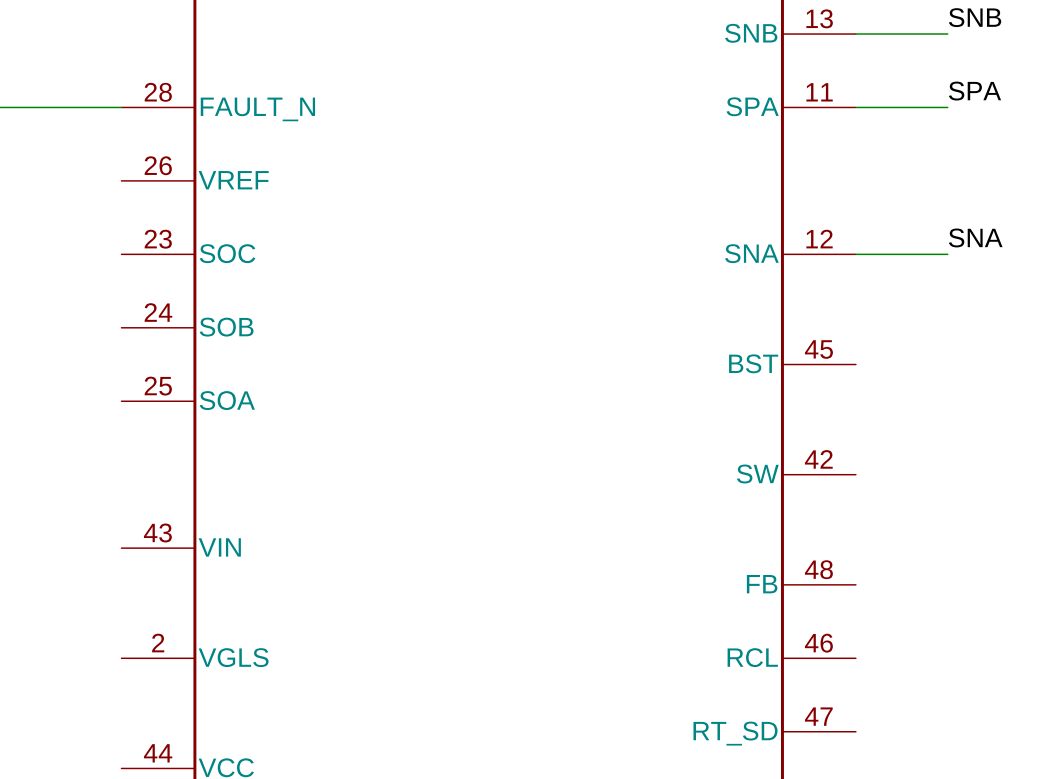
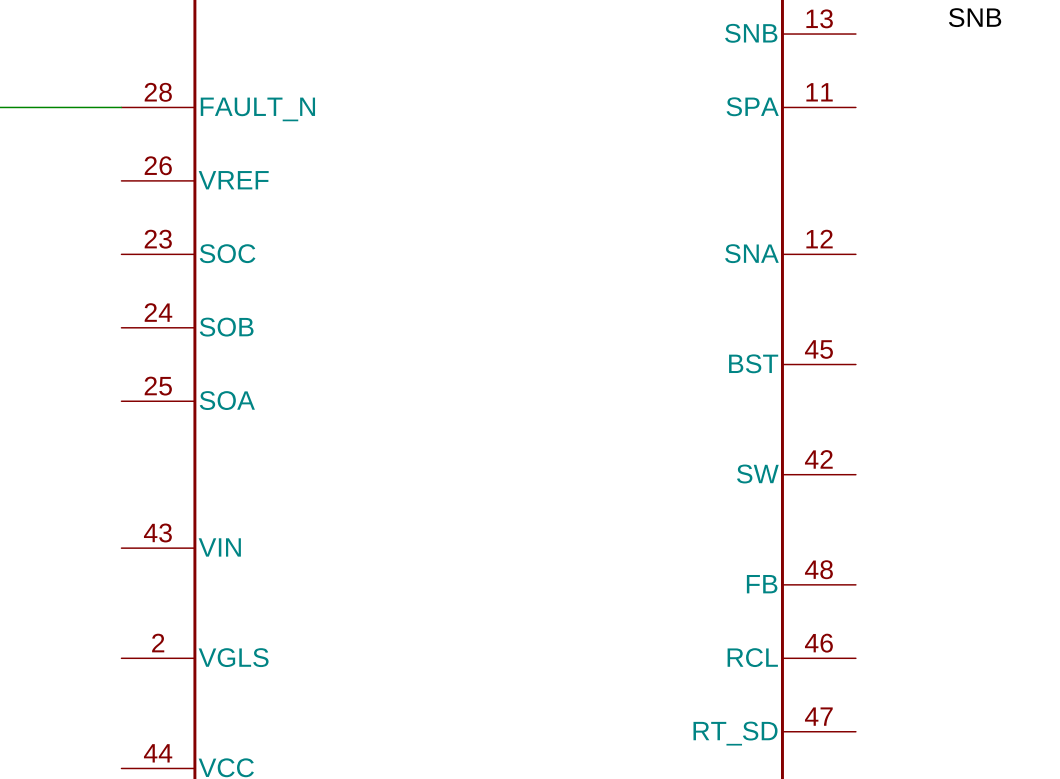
wire: (855, 34) (947, 34) -> none
label: SPA (975, 91) -> none
wire: (855, 107) (947, 107) -> none
label: SNA (975, 237) -> none
wire: (855, 254) (947, 254) -> none

